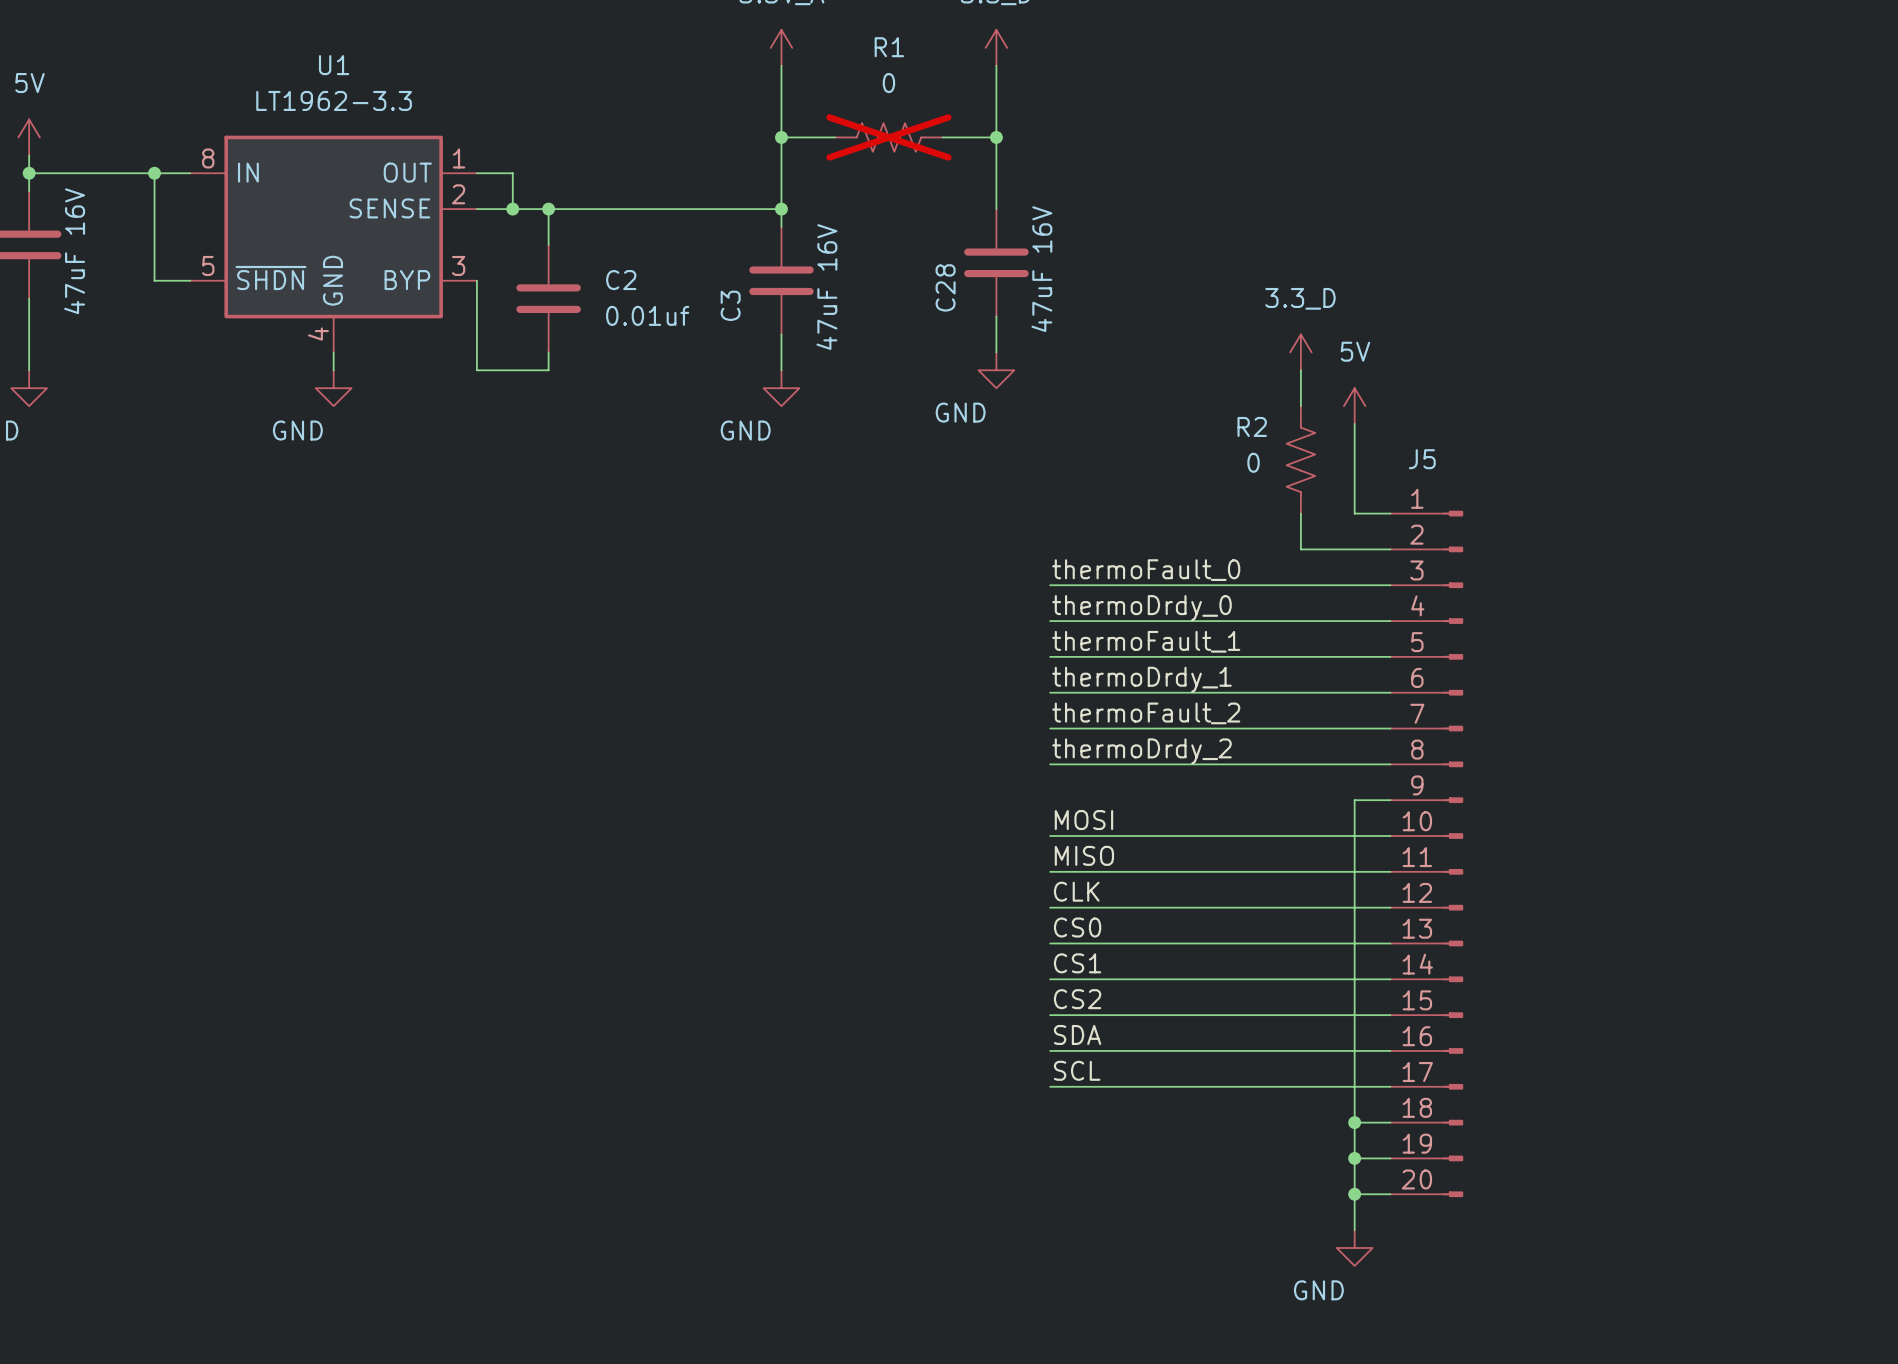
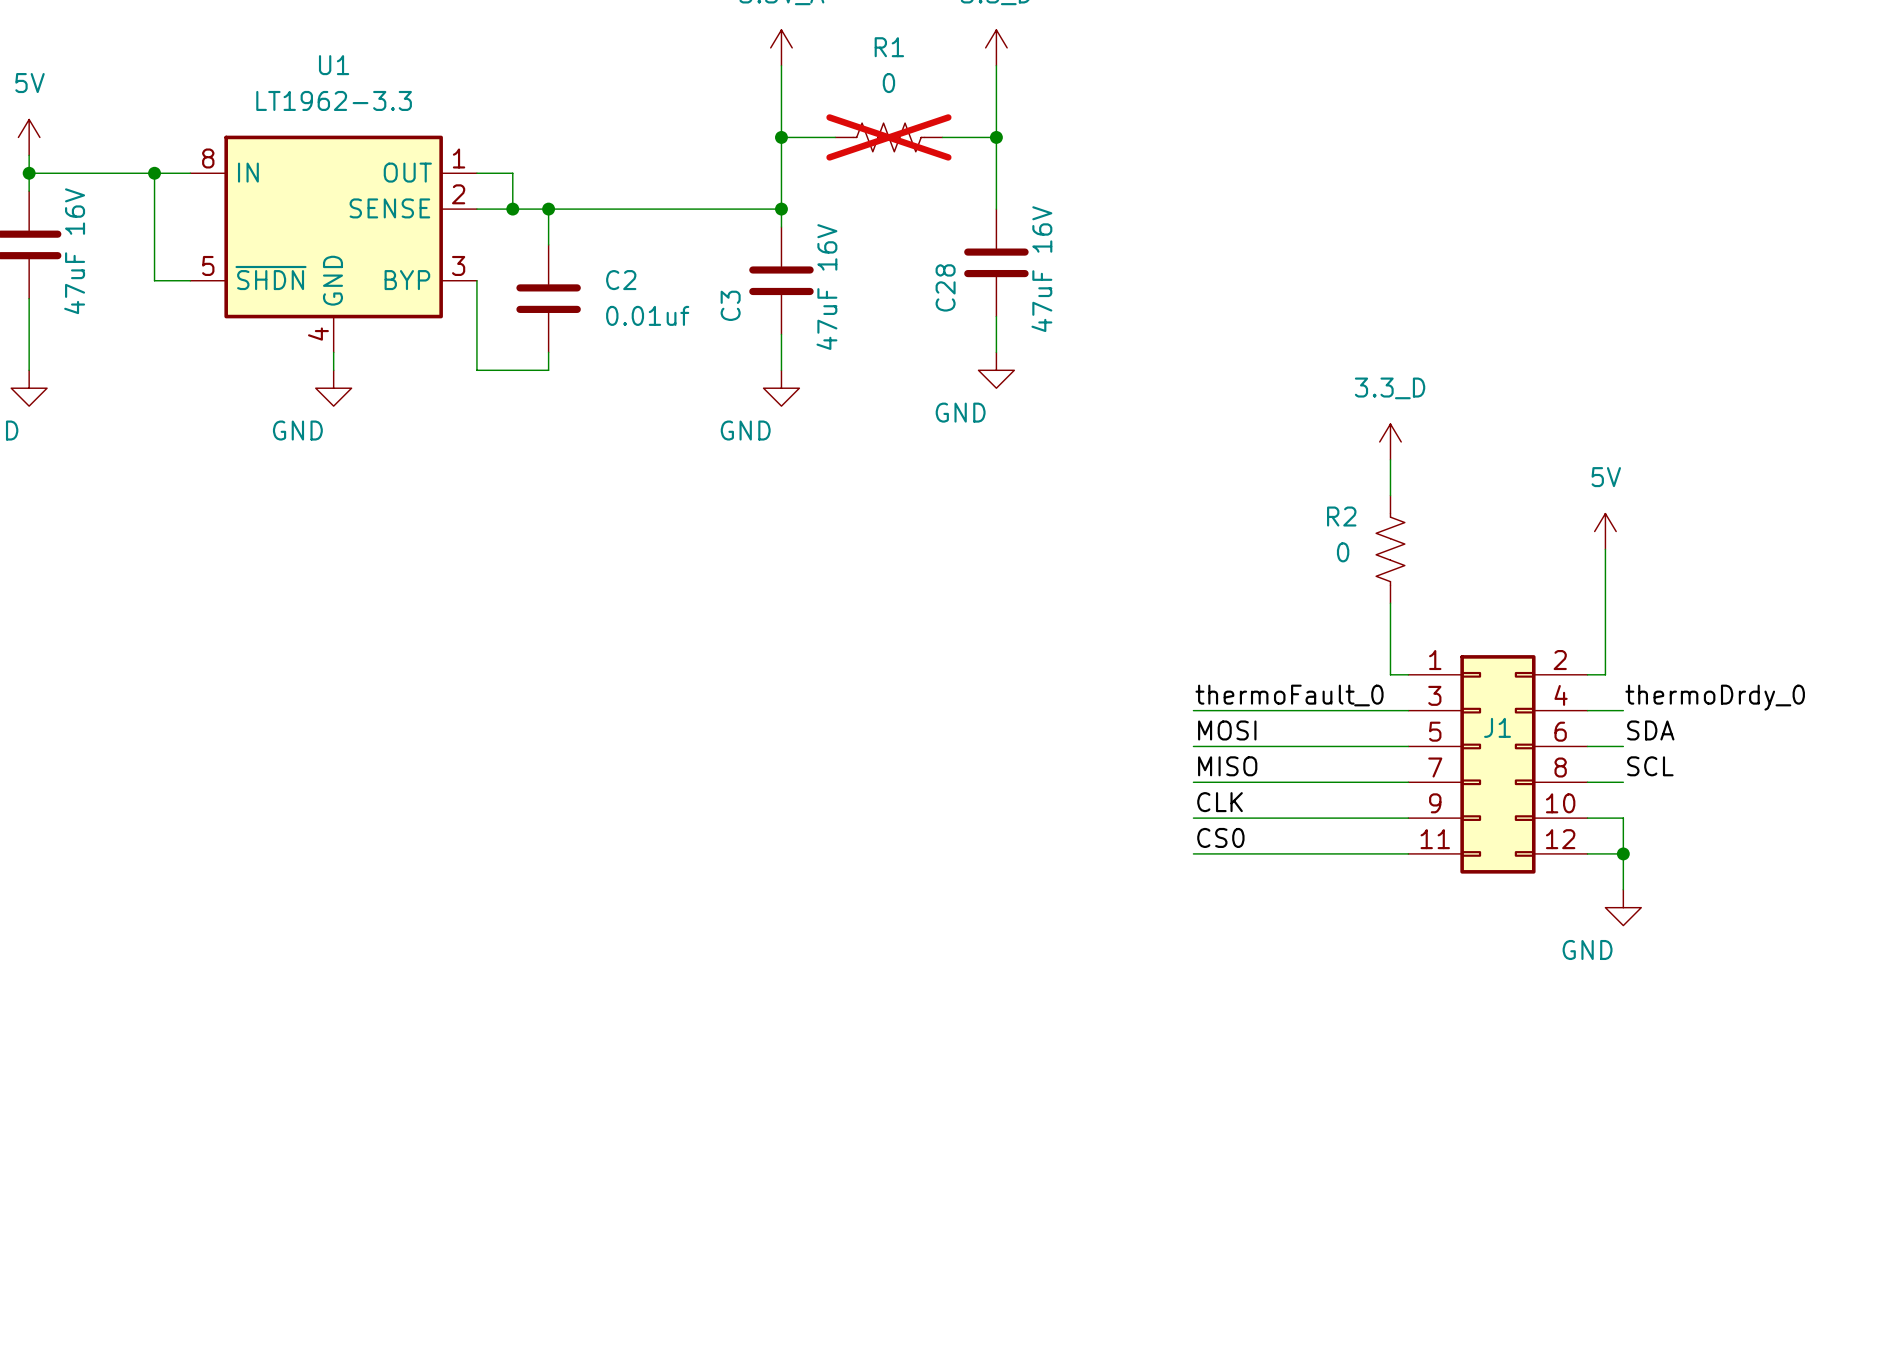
power symbol position: 3.3_D (1300, 352) -> 3.3_D (1390, 441)
wire: (1300, 370) (1300, 406) -> (1390, 459) (1390, 495)
power symbol position: 5V (1354, 406) -> 5V (1605, 531)
wire: (1354, 424) (1354, 513) (1390, 513) -> none
R2 position: (1300, 459) -> (1390, 549)
wire: (1300, 513) (1300, 549) (1390, 549) -> none
wire: none -> (1605, 549) (1605, 674) (1587, 674)
label position: thermoFault_0 (1146, 570) -> thermoFault_0 (1289, 695)
wire: (1050, 585) (1390, 585) -> none
wire: none -> (1390, 603) (1390, 674) (1408, 674)
label: thermoDrdy_0 (1141, 608) -> none
wire: (1050, 621) (1390, 621) -> none
label: thermoFault_1 (1146, 641) -> none
wire: (1050, 656) (1390, 656) -> none
label: thermoDrdy_1 (1141, 679) -> none
wire: (1050, 692) (1390, 692) -> none
label: none -> thermoDrdy_0 (1715, 697)
wire: none -> (1193, 710) (1408, 710)
wire: none -> (1587, 710) (1623, 710)
label: thermoFault_2 (1146, 713) -> none
wire: (1050, 728) (1390, 728) -> none
label: none -> SDA (1650, 730)
wire: none -> (1193, 746) (1408, 746)
wire: none -> (1587, 746) (1623, 746)
label: thermoDrdy_2 (1141, 751) -> none
wire: (1050, 764) (1390, 764) -> none
J1: none -> (1497, 764)
label: none -> SCL (1650, 766)
wire: none -> (1193, 782) (1408, 782)
wire: none -> (1587, 782) (1623, 782)
wire: (1390, 800) (1354, 800) (1354, 1230) -> none
wire: none -> (1193, 818) (1408, 818)
wire: none -> (1587, 818) (1623, 818) (1623, 889)
label position: MOSI (1083, 820) -> MOSI (1227, 730)
wire: (1050, 836) (1390, 836) -> none
wire: none -> (1193, 853) (1408, 853)
J5: (1426, 853) -> none
wire: none -> (1587, 853) (1623, 853)
junction: none -> (1623, 853)
label position: MISO (1084, 855) -> MISO (1227, 766)
wire: (1050, 871) (1390, 871) -> none
label position: CLK (1076, 891) -> CLK (1220, 802)
wire: (1050, 907) (1390, 907) -> none
power symbol: none -> GND (1623, 907)
label position: CS0 (1077, 927) -> CS0 (1220, 837)
wire: (1050, 943) (1390, 943) -> none
label: CS1 (1077, 963) -> none
wire: (1050, 979) (1390, 979) -> none
label: CS2 (1077, 999) -> none
wire: (1050, 1015) (1390, 1015) -> none
label: SDA (1077, 1034) -> none
wire: (1050, 1050) (1390, 1050) -> none
label: SCL (1077, 1070) -> none
wire: (1050, 1086) (1390, 1086) -> none
wire: (1354, 1122) (1390, 1122) -> none
junction: (1354, 1122) -> none
wire: (1354, 1158) (1390, 1158) -> none
junction: (1354, 1158) -> none
wire: (1354, 1194) (1390, 1194) -> none
junction: (1354, 1194) -> none
power symbol: GND (1354, 1248) -> none

